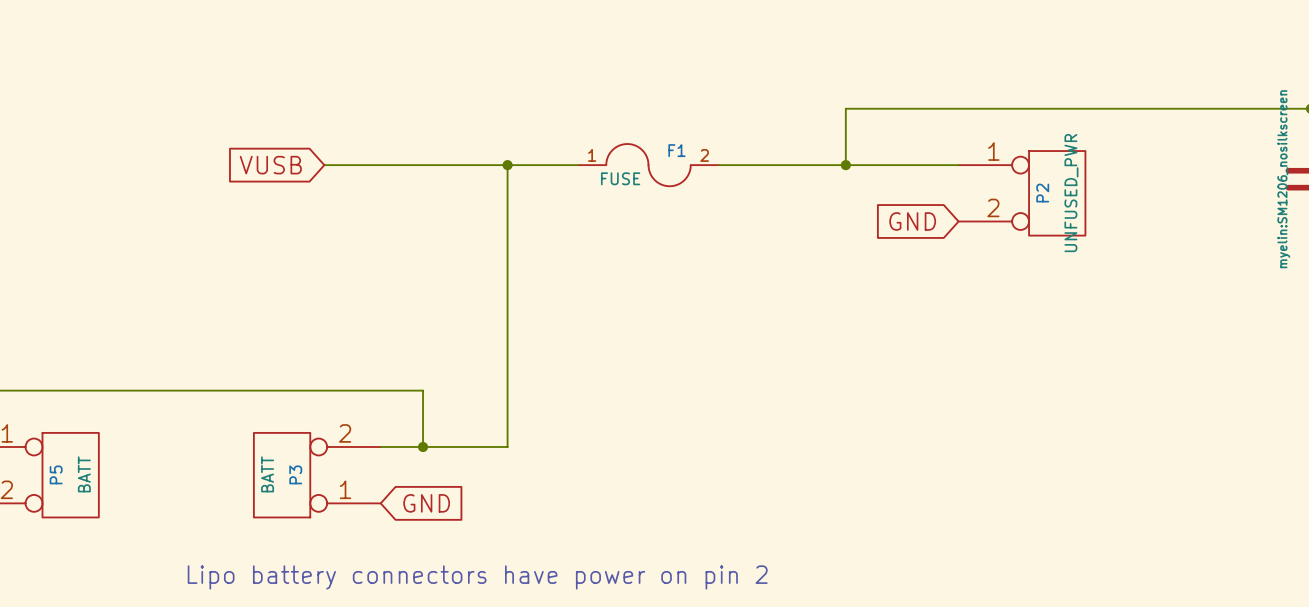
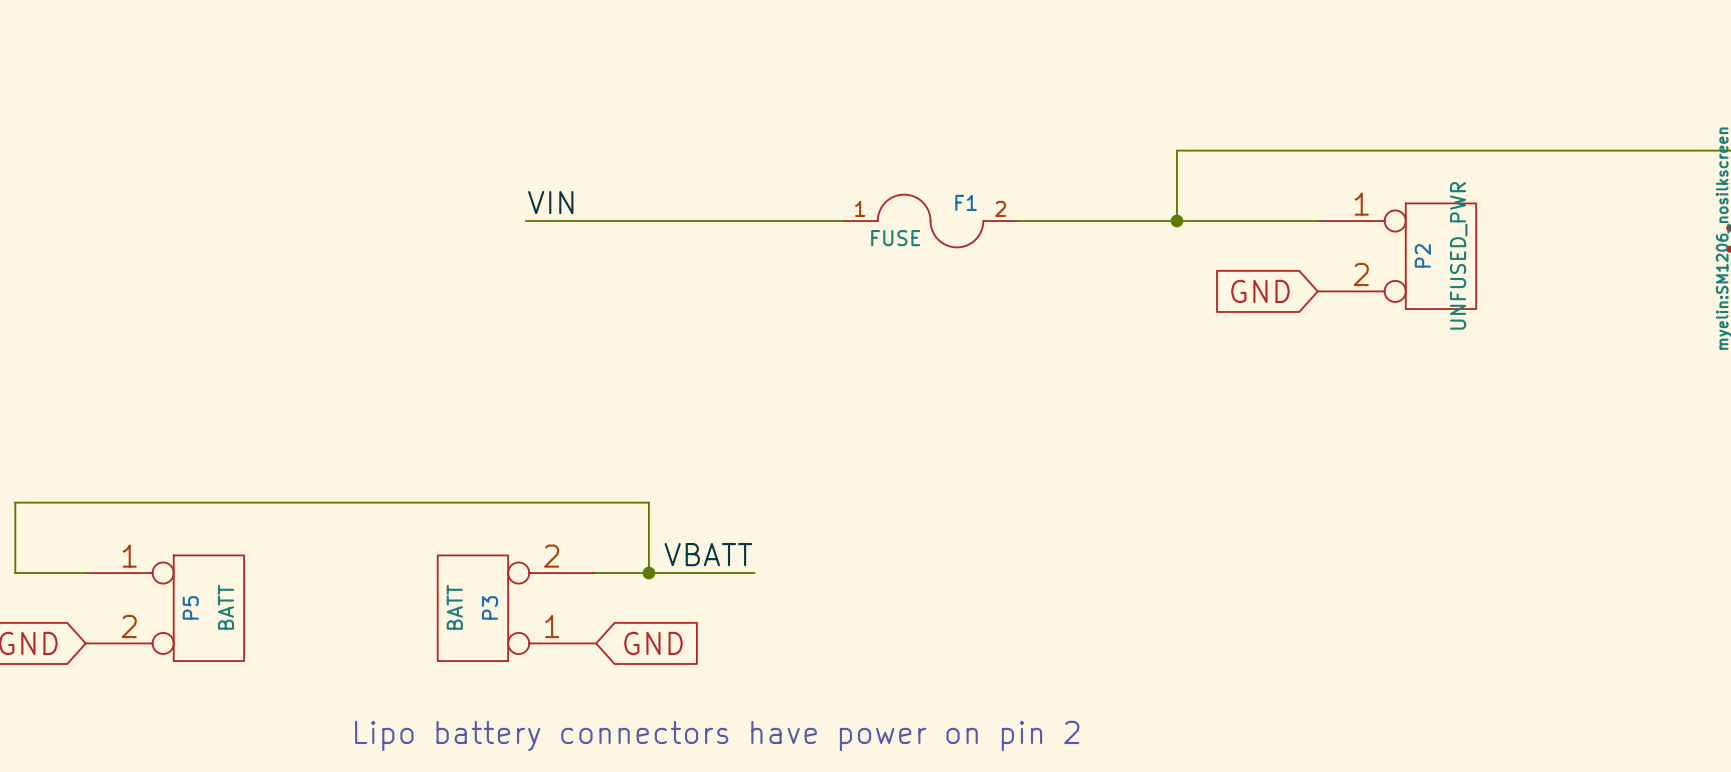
label: none -> VIN (550, 202)
global label: VUSB (270, 165) -> none
wire: (507, 165) (507, 447) -> none
junction: (507, 165) -> none
label: none -> VBATT (708, 554)

